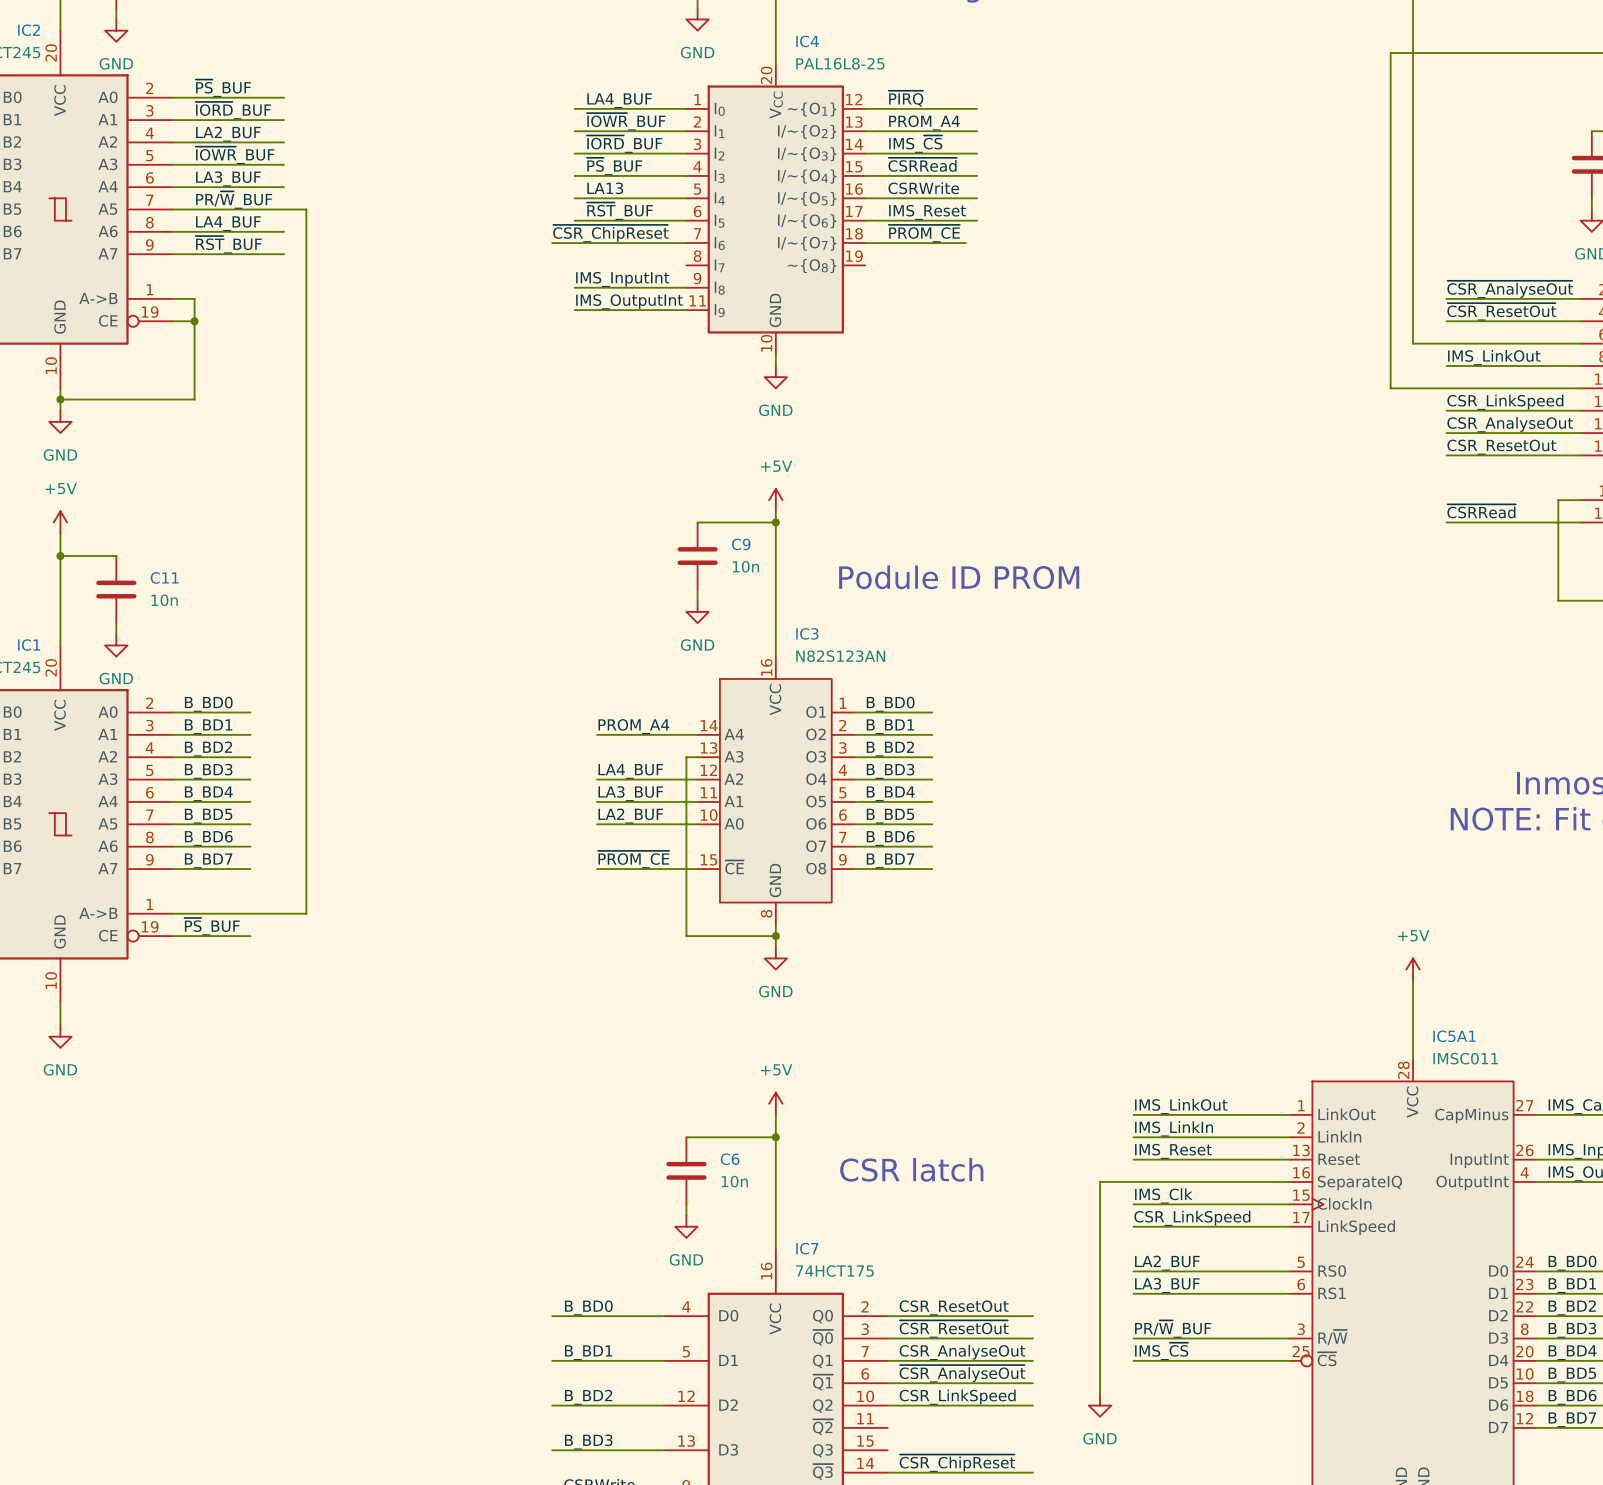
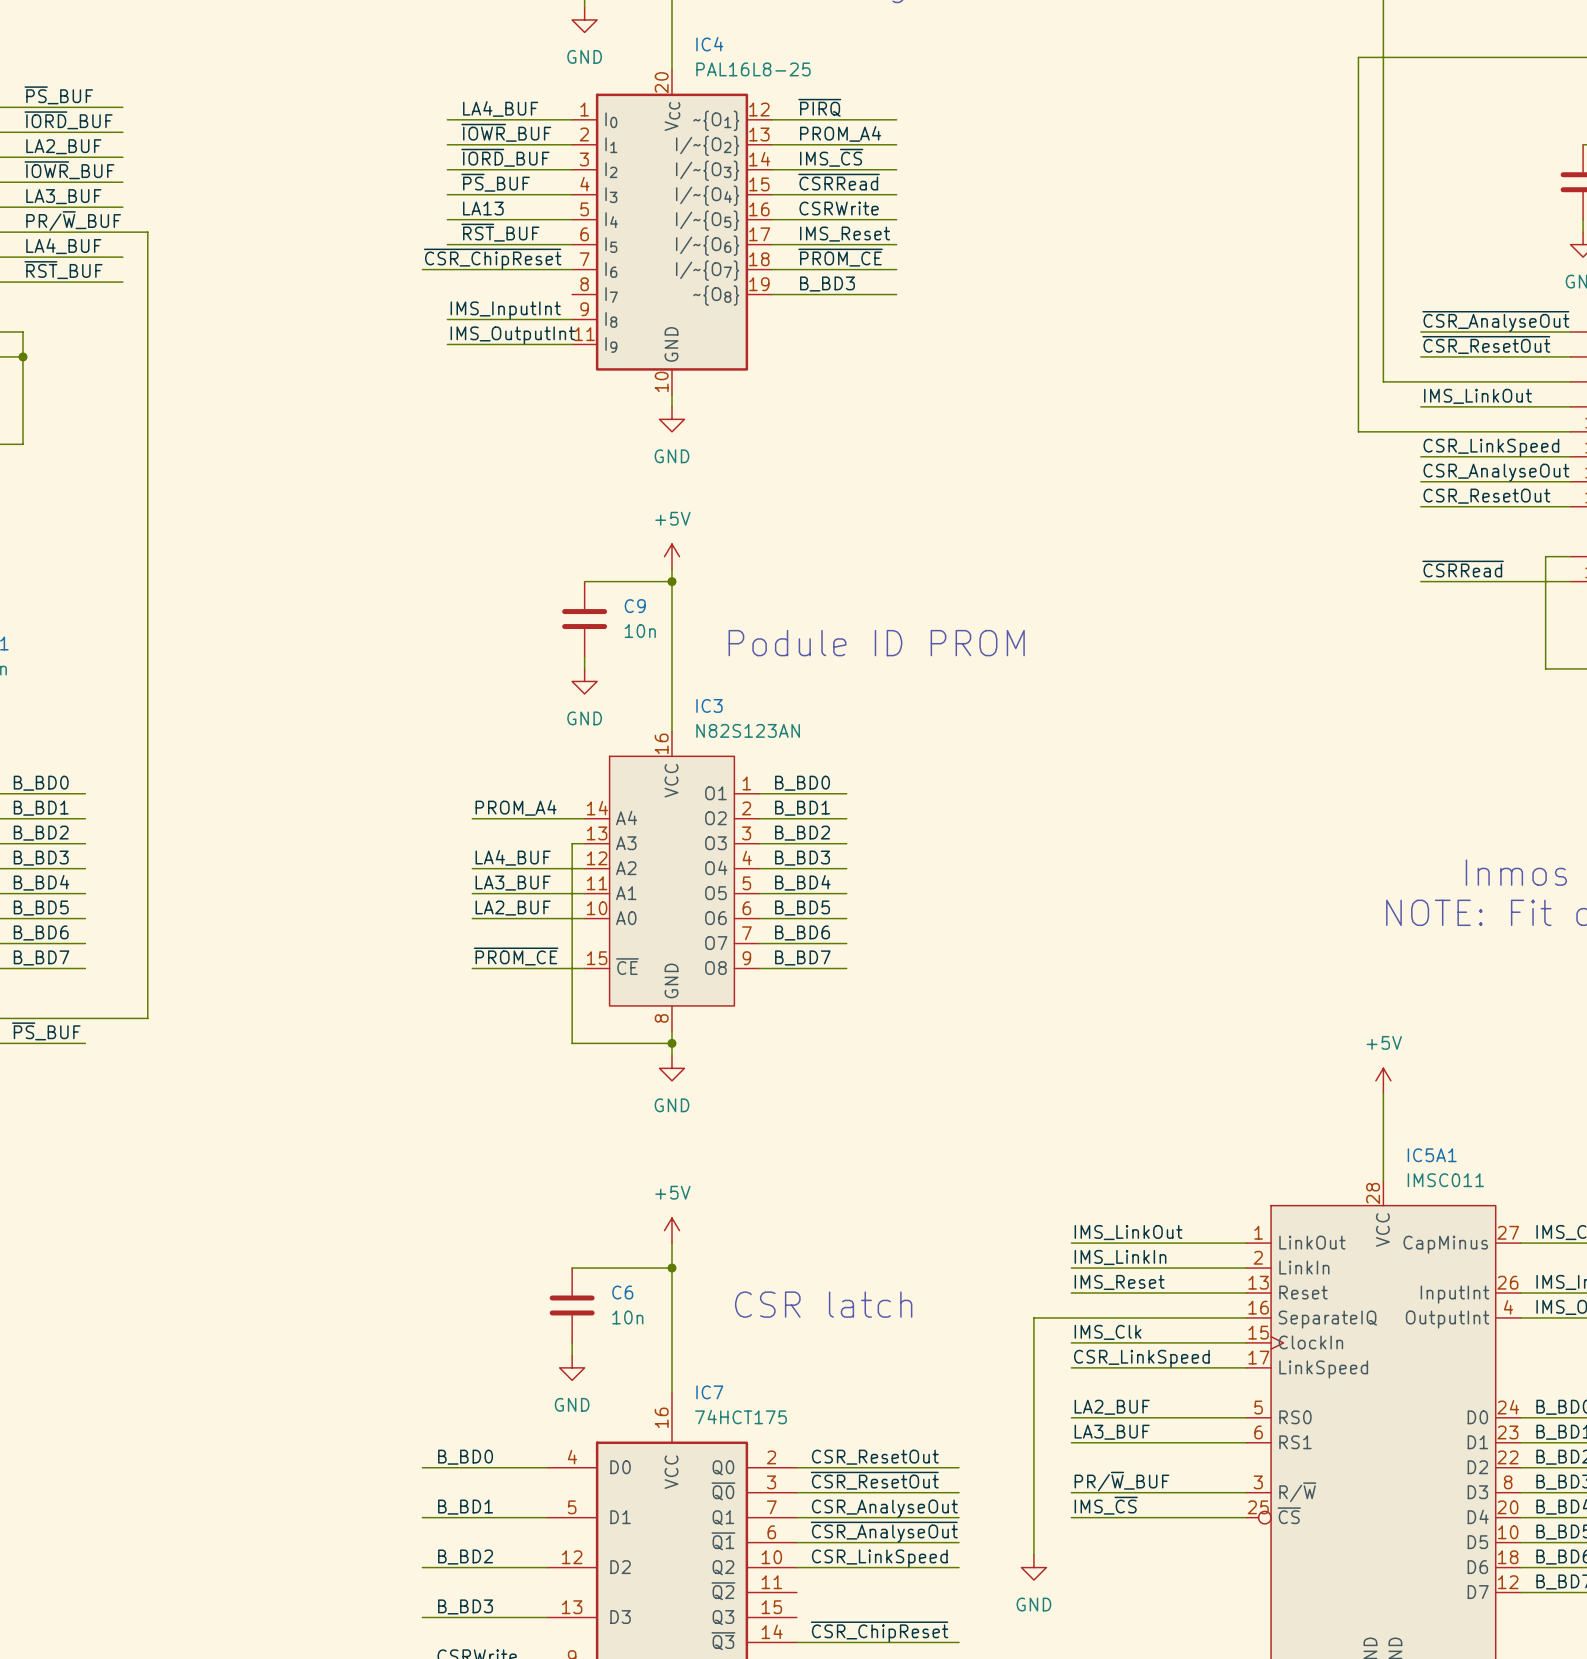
wire: none -> (884, 269) (896, 269)
label: none -> B_BD3 (827, 284)
wire: none -> (771, 294) (896, 294)

